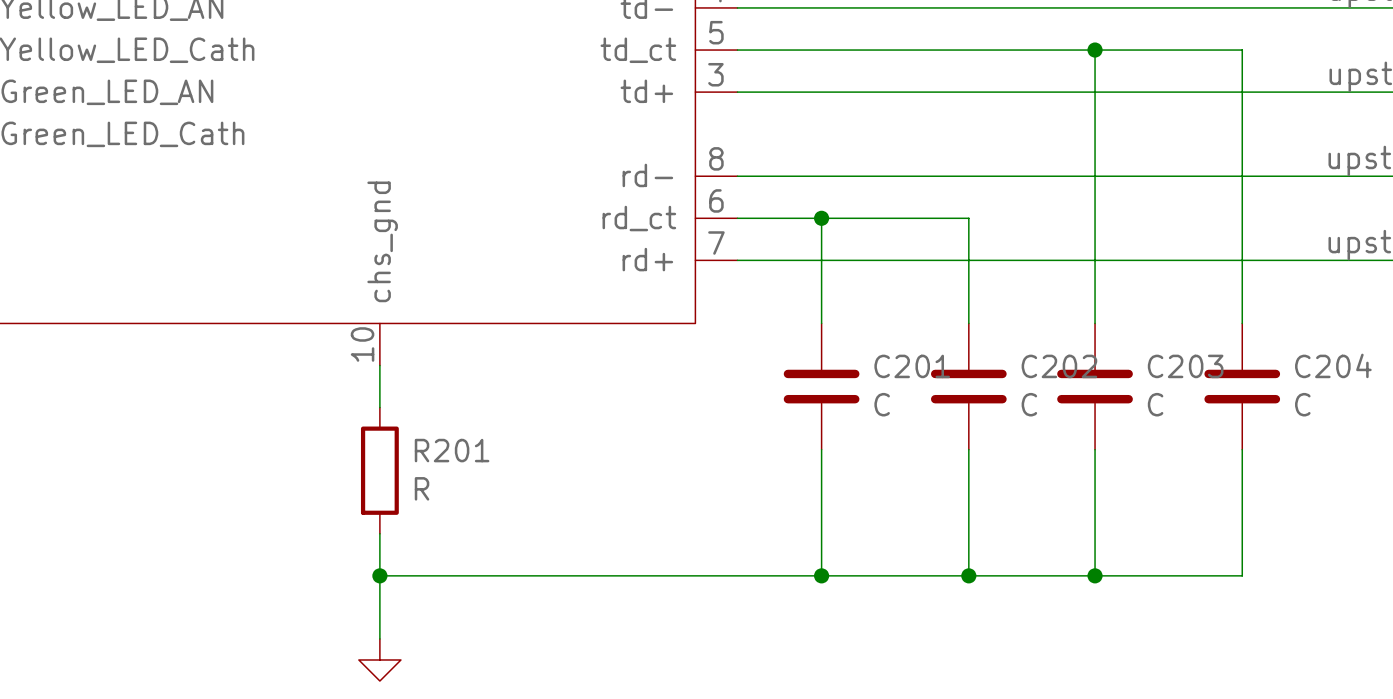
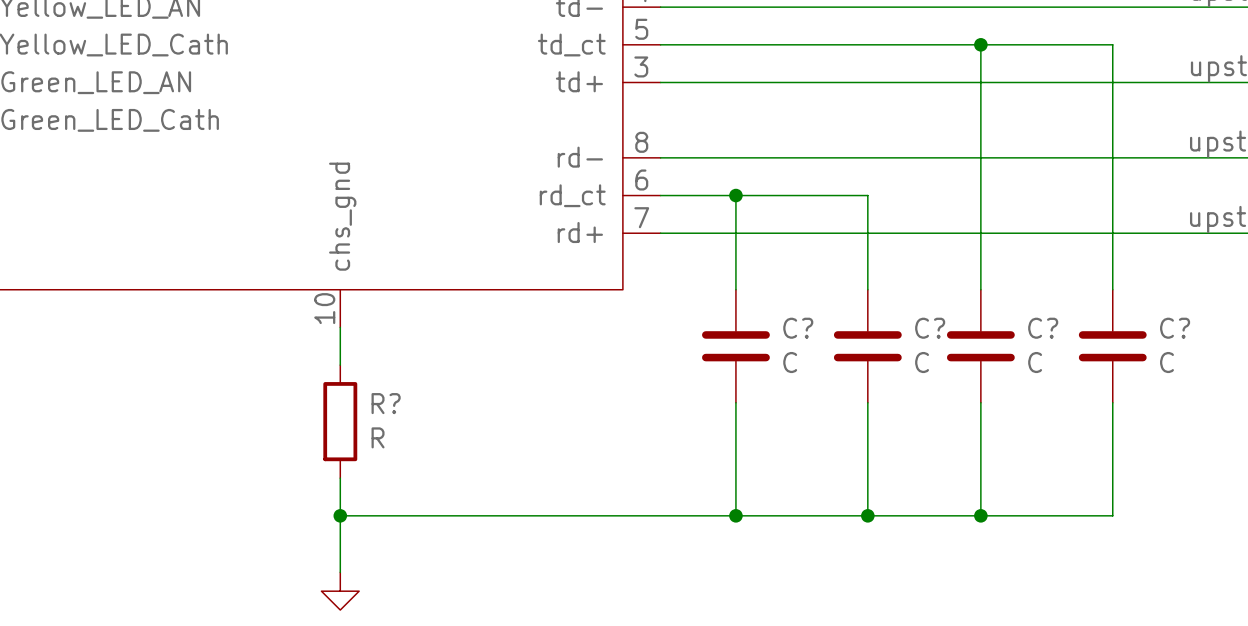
C204 name: C204 (1333, 365) -> C? (1175, 328)
C201 name: C201 (912, 366) -> C? (798, 328)
C202 name: C202 (1059, 366) -> C? (930, 328)
C203 name: C203 (1185, 366) -> C? (1043, 328)
R201 name: R201 (452, 450) -> R? (386, 403)

